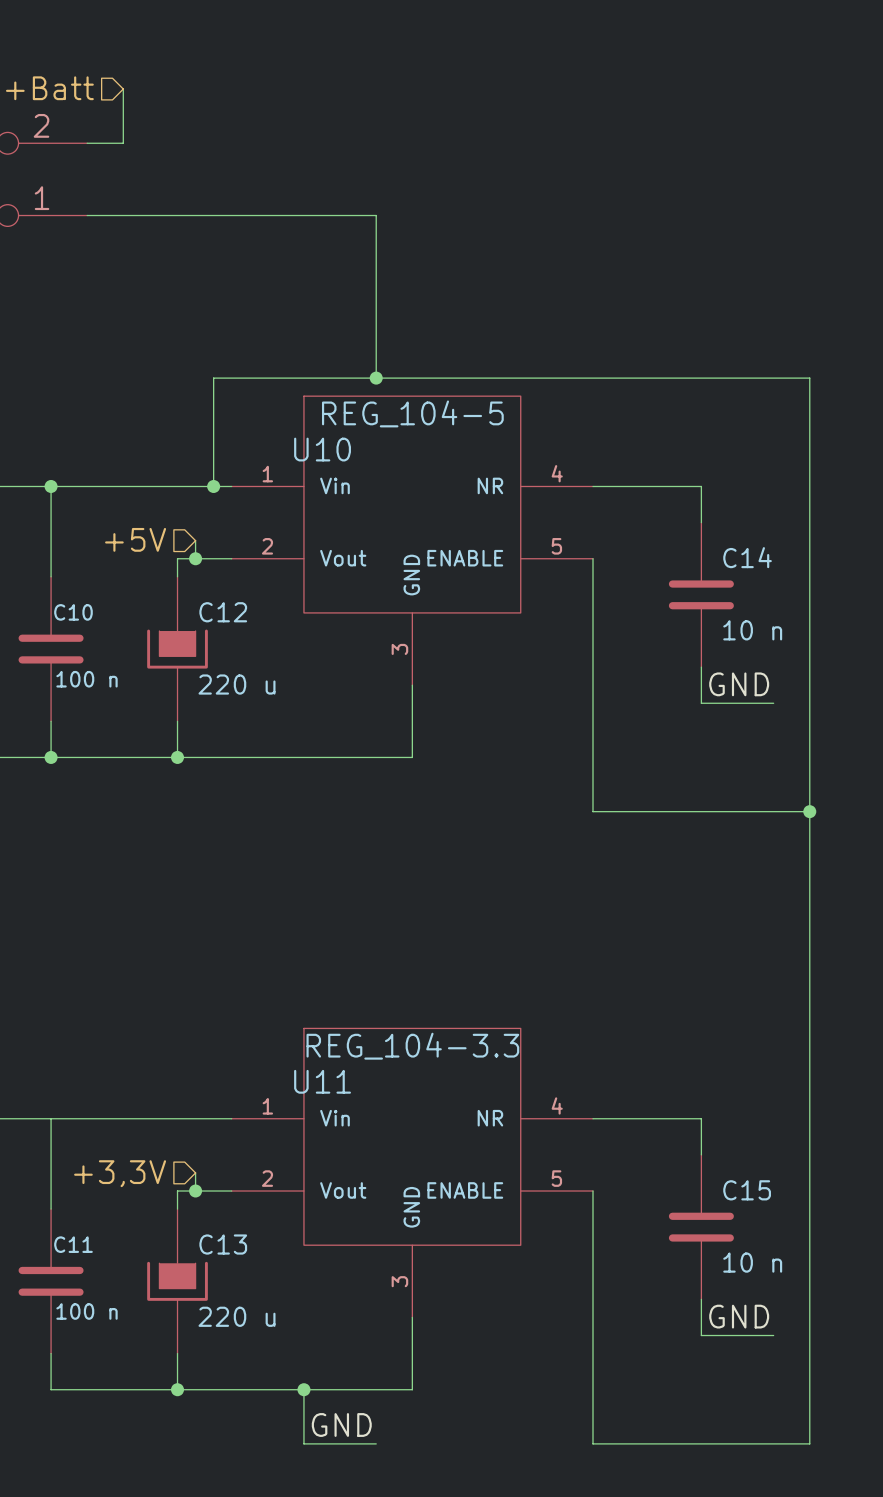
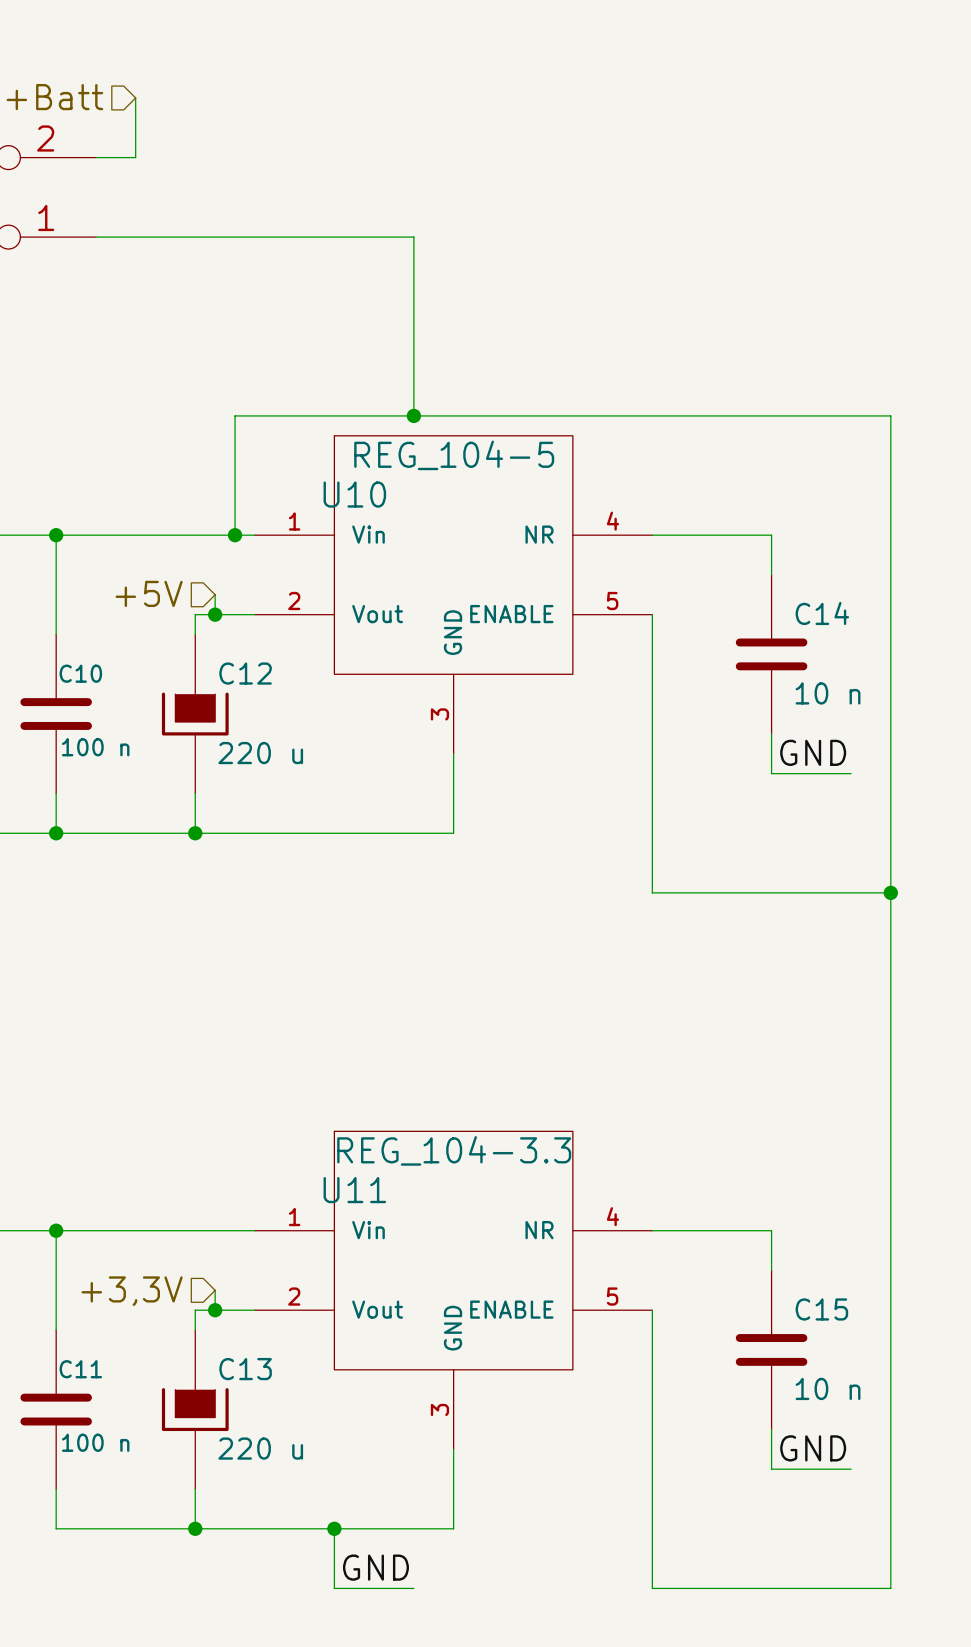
junction: none -> (56, 1230)

